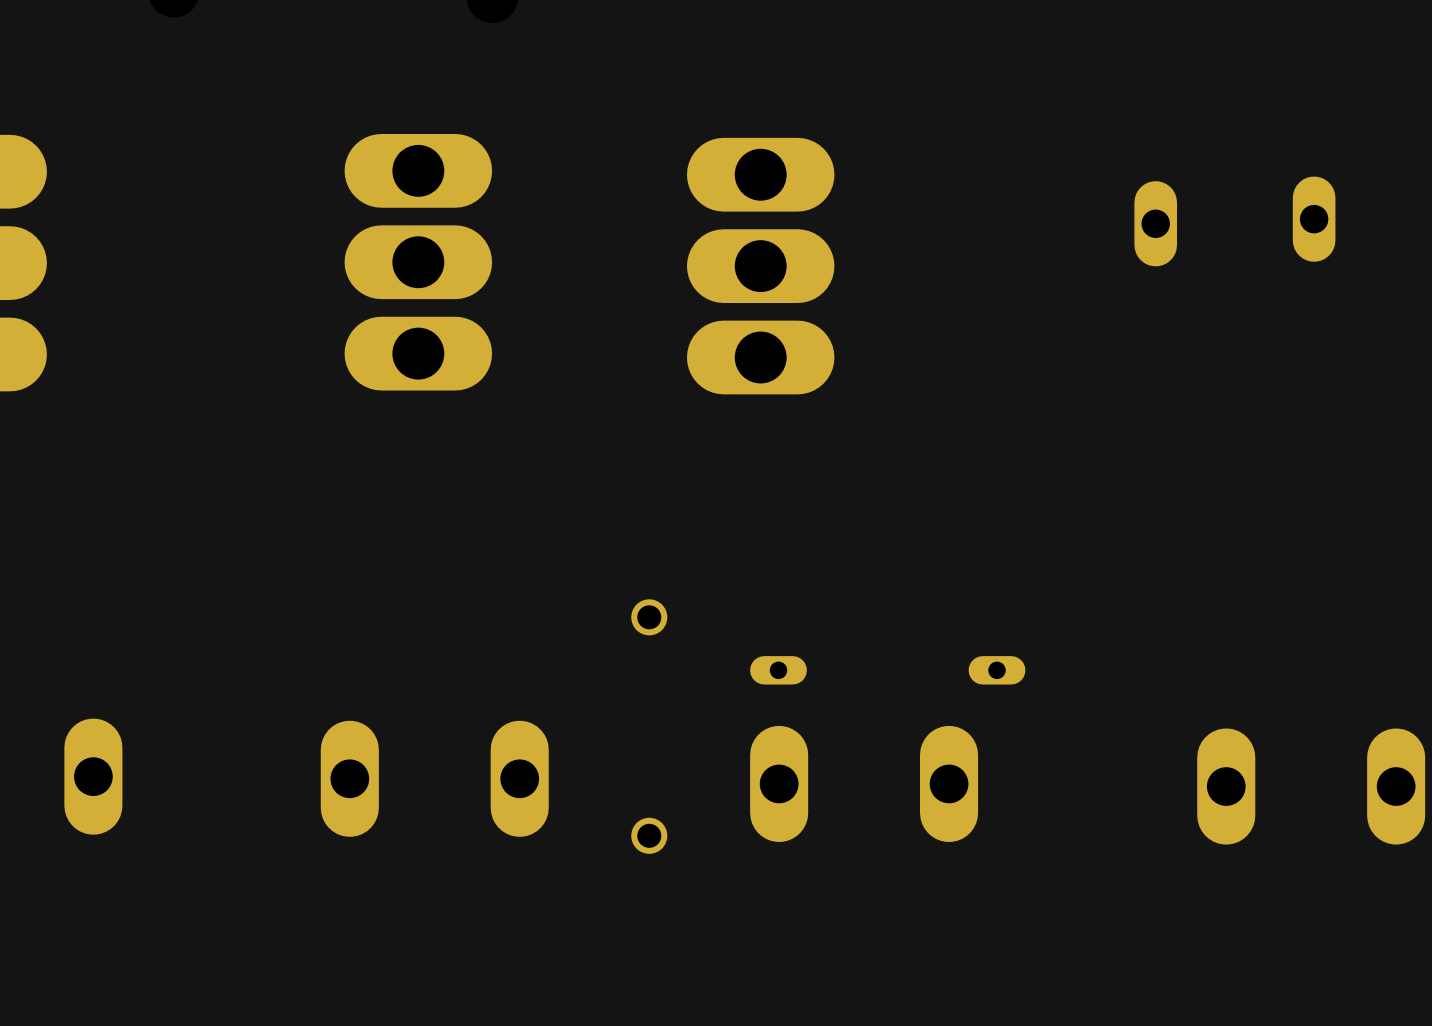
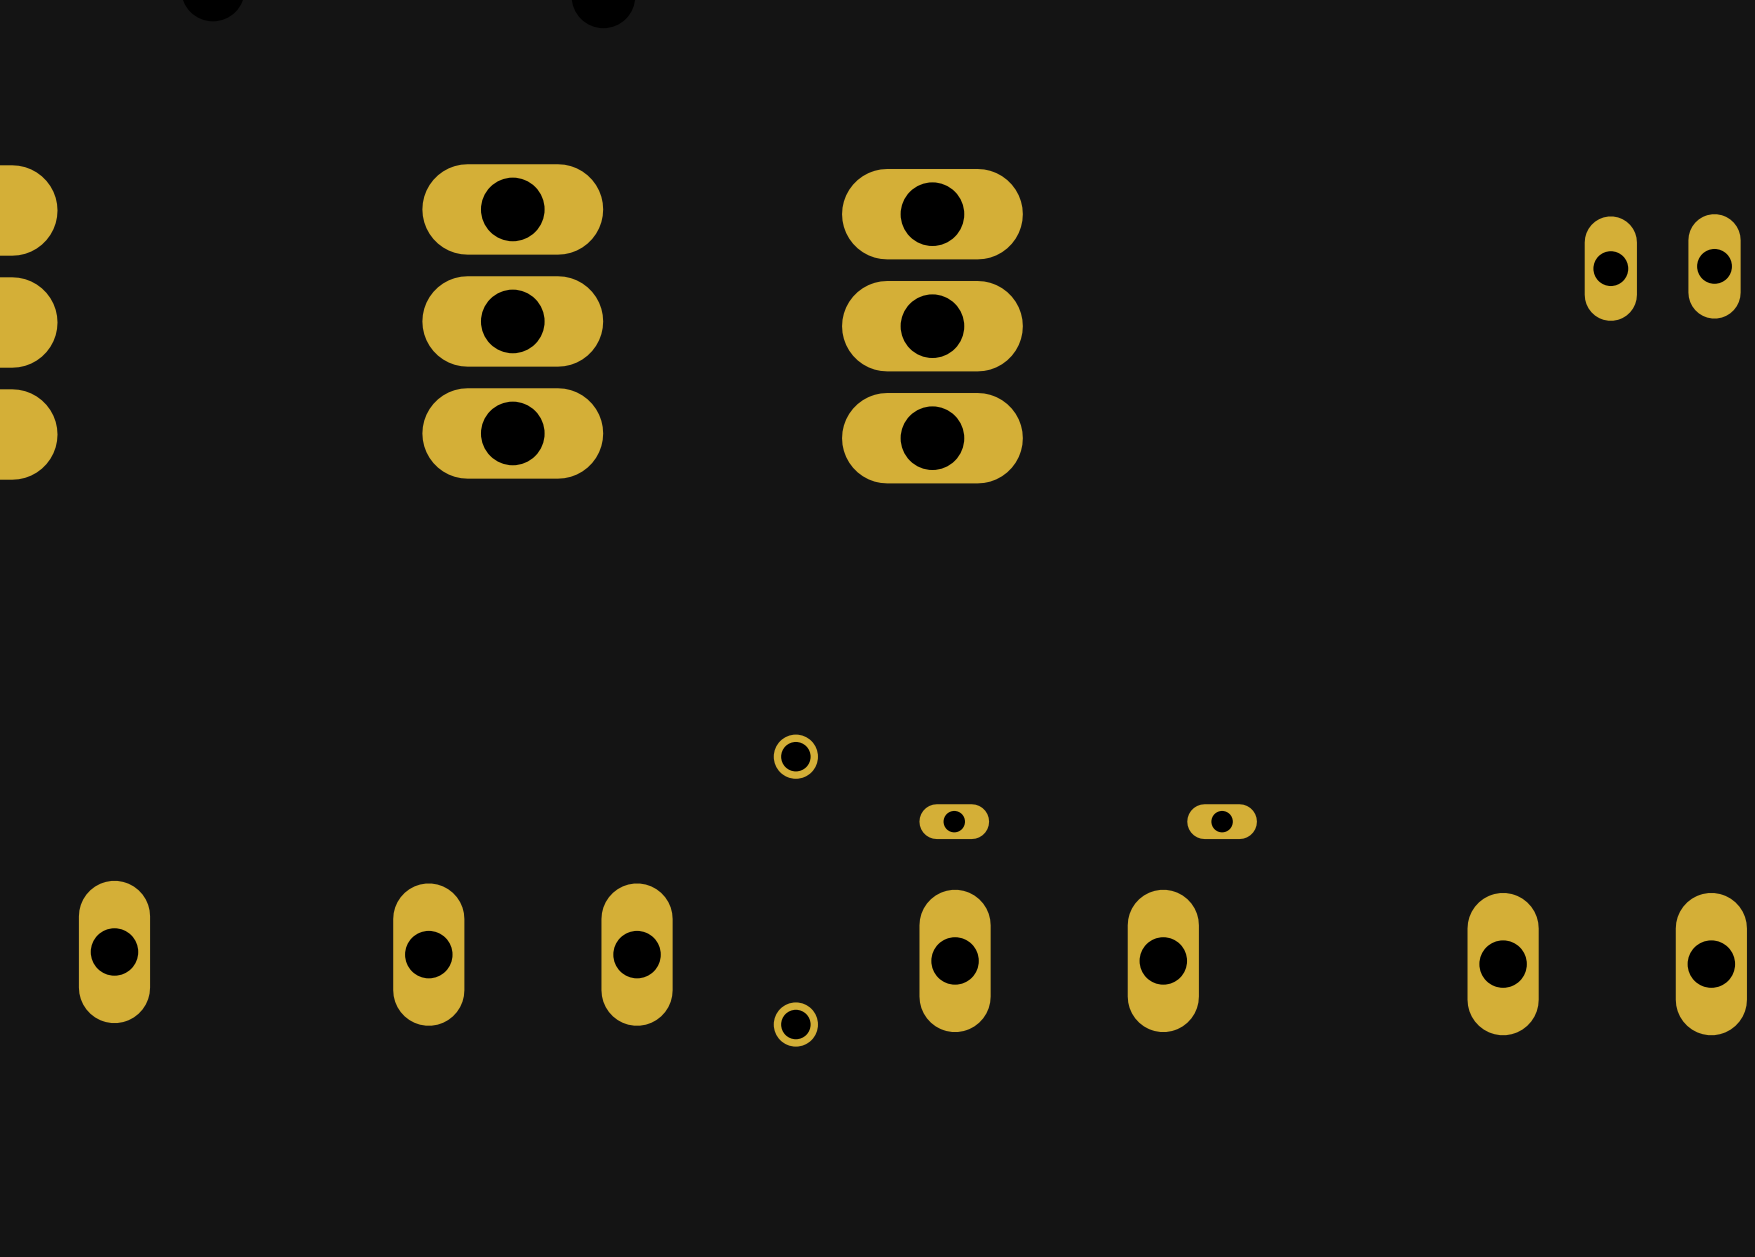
part position: (1155, 223) -> (1714, 266)

